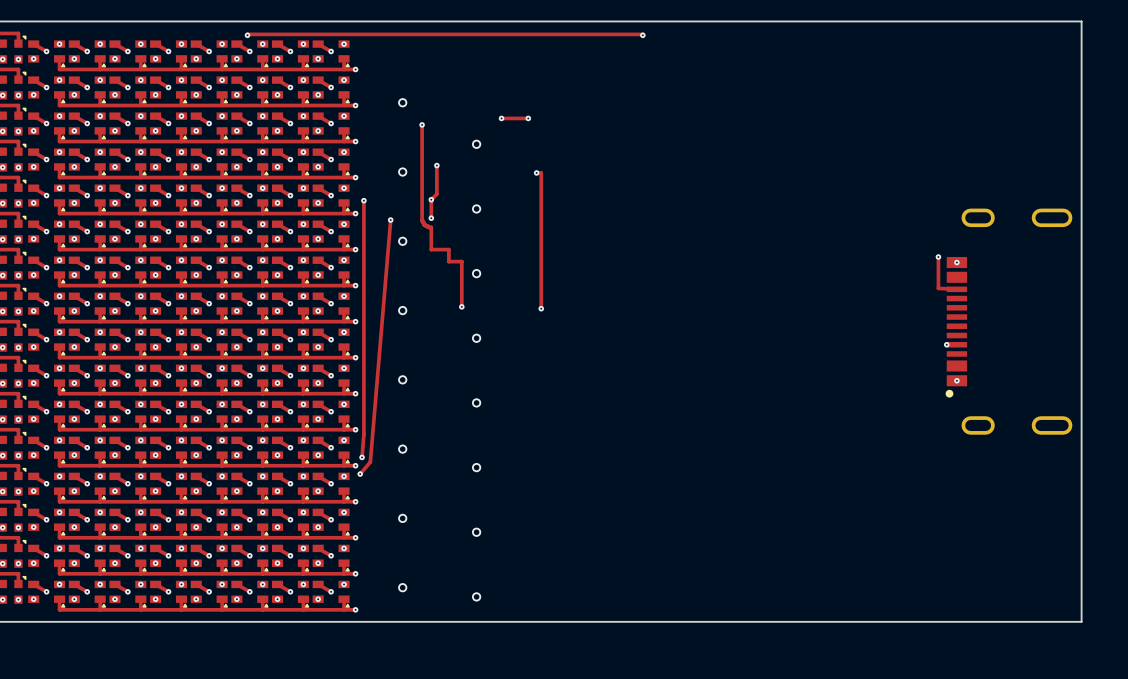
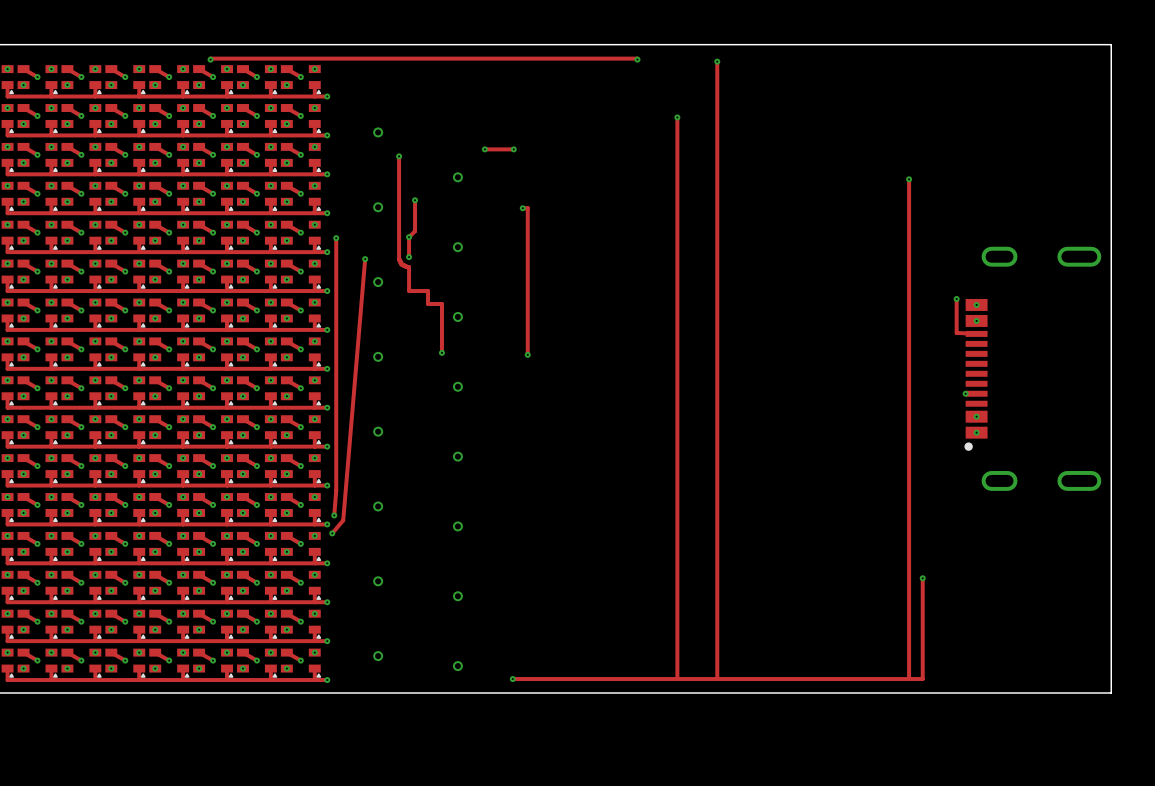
track: none -> (717, 61) (717, 679)
via: none -> (717, 61)
track: none -> (677, 117) (677, 679)
via: none -> (677, 117)
track: none -> (909, 179) (909, 679)
via: none -> (909, 179)
via: none -> (976, 320)
via: none -> (976, 416)
track: none -> (922, 578) (922, 679) (512, 679)
via: none -> (922, 578)
via: none -> (512, 679)

